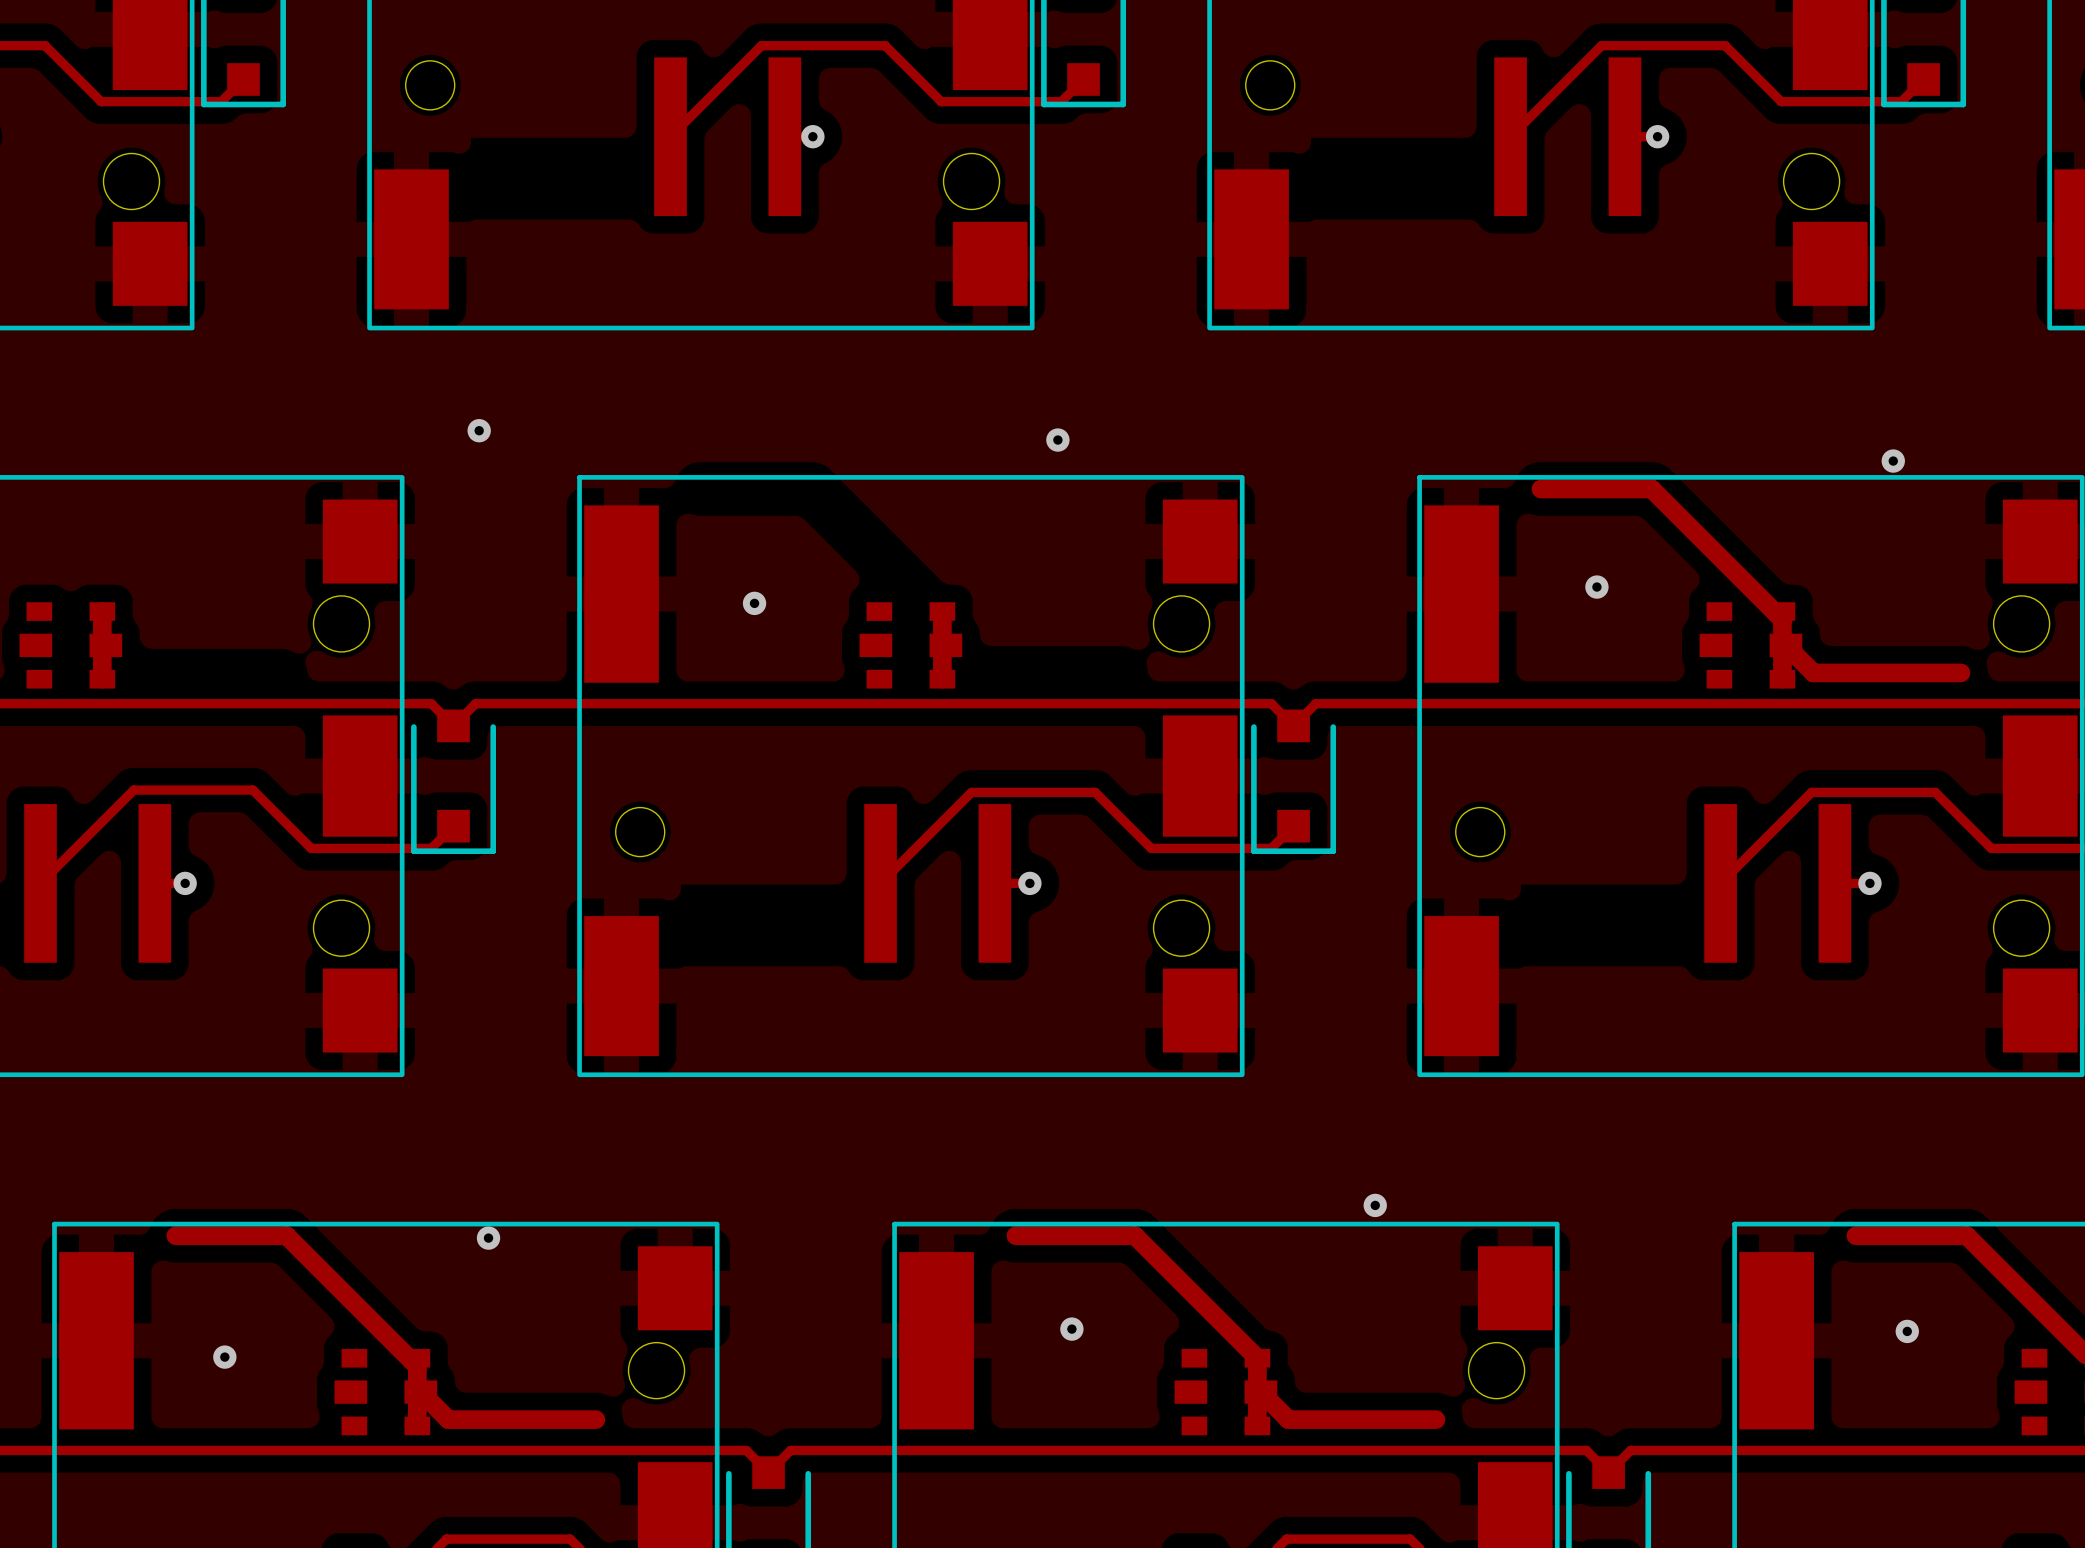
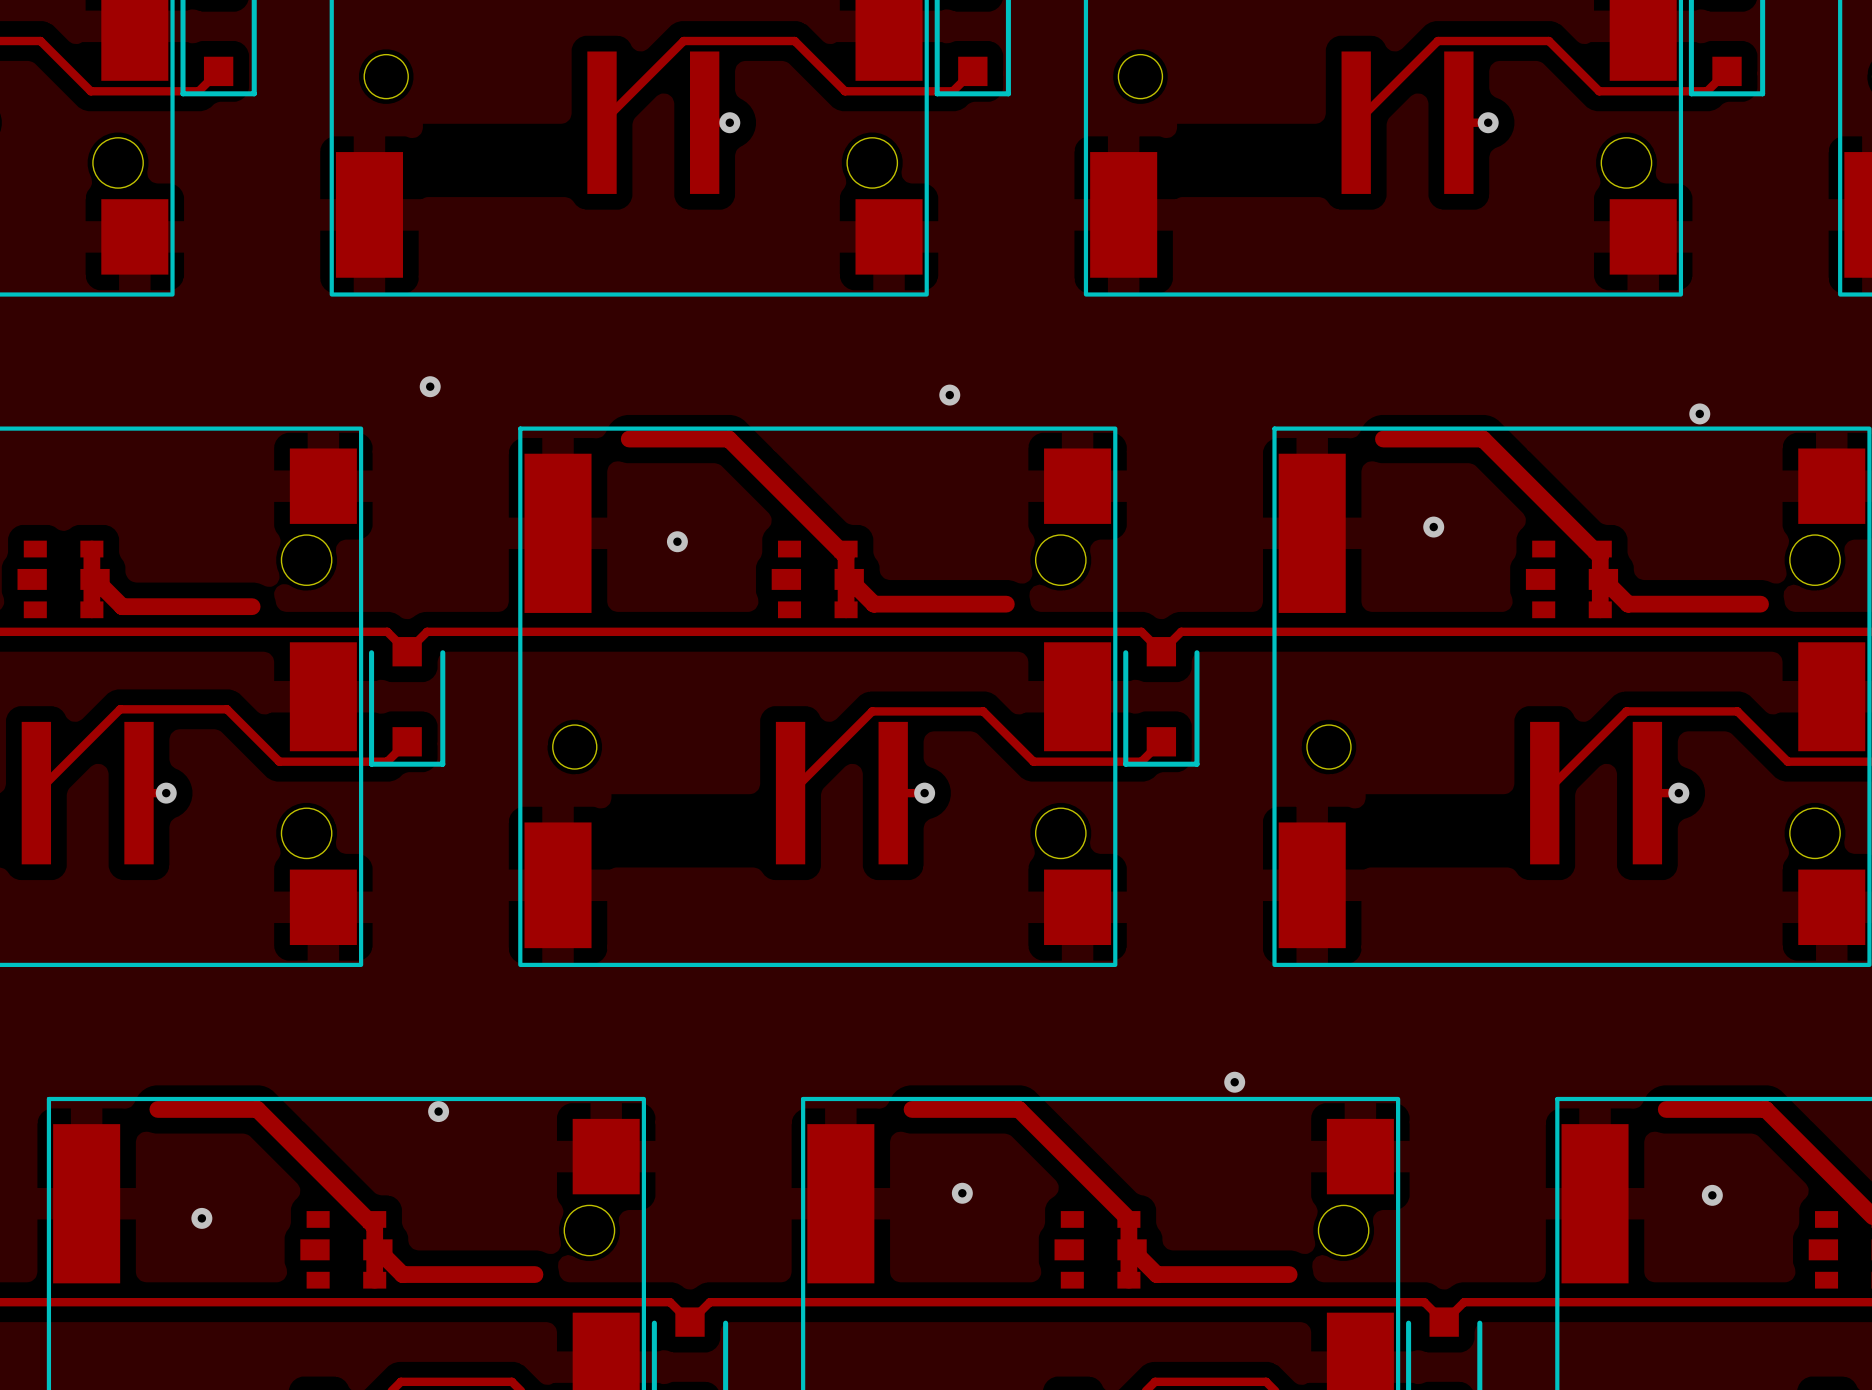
track: none -> (629, 439) (728, 439) (846, 556)
track: none -> (95, 579) (122, 606) (252, 606)
track: none -> (849, 579) (873, 604) (1006, 604)

